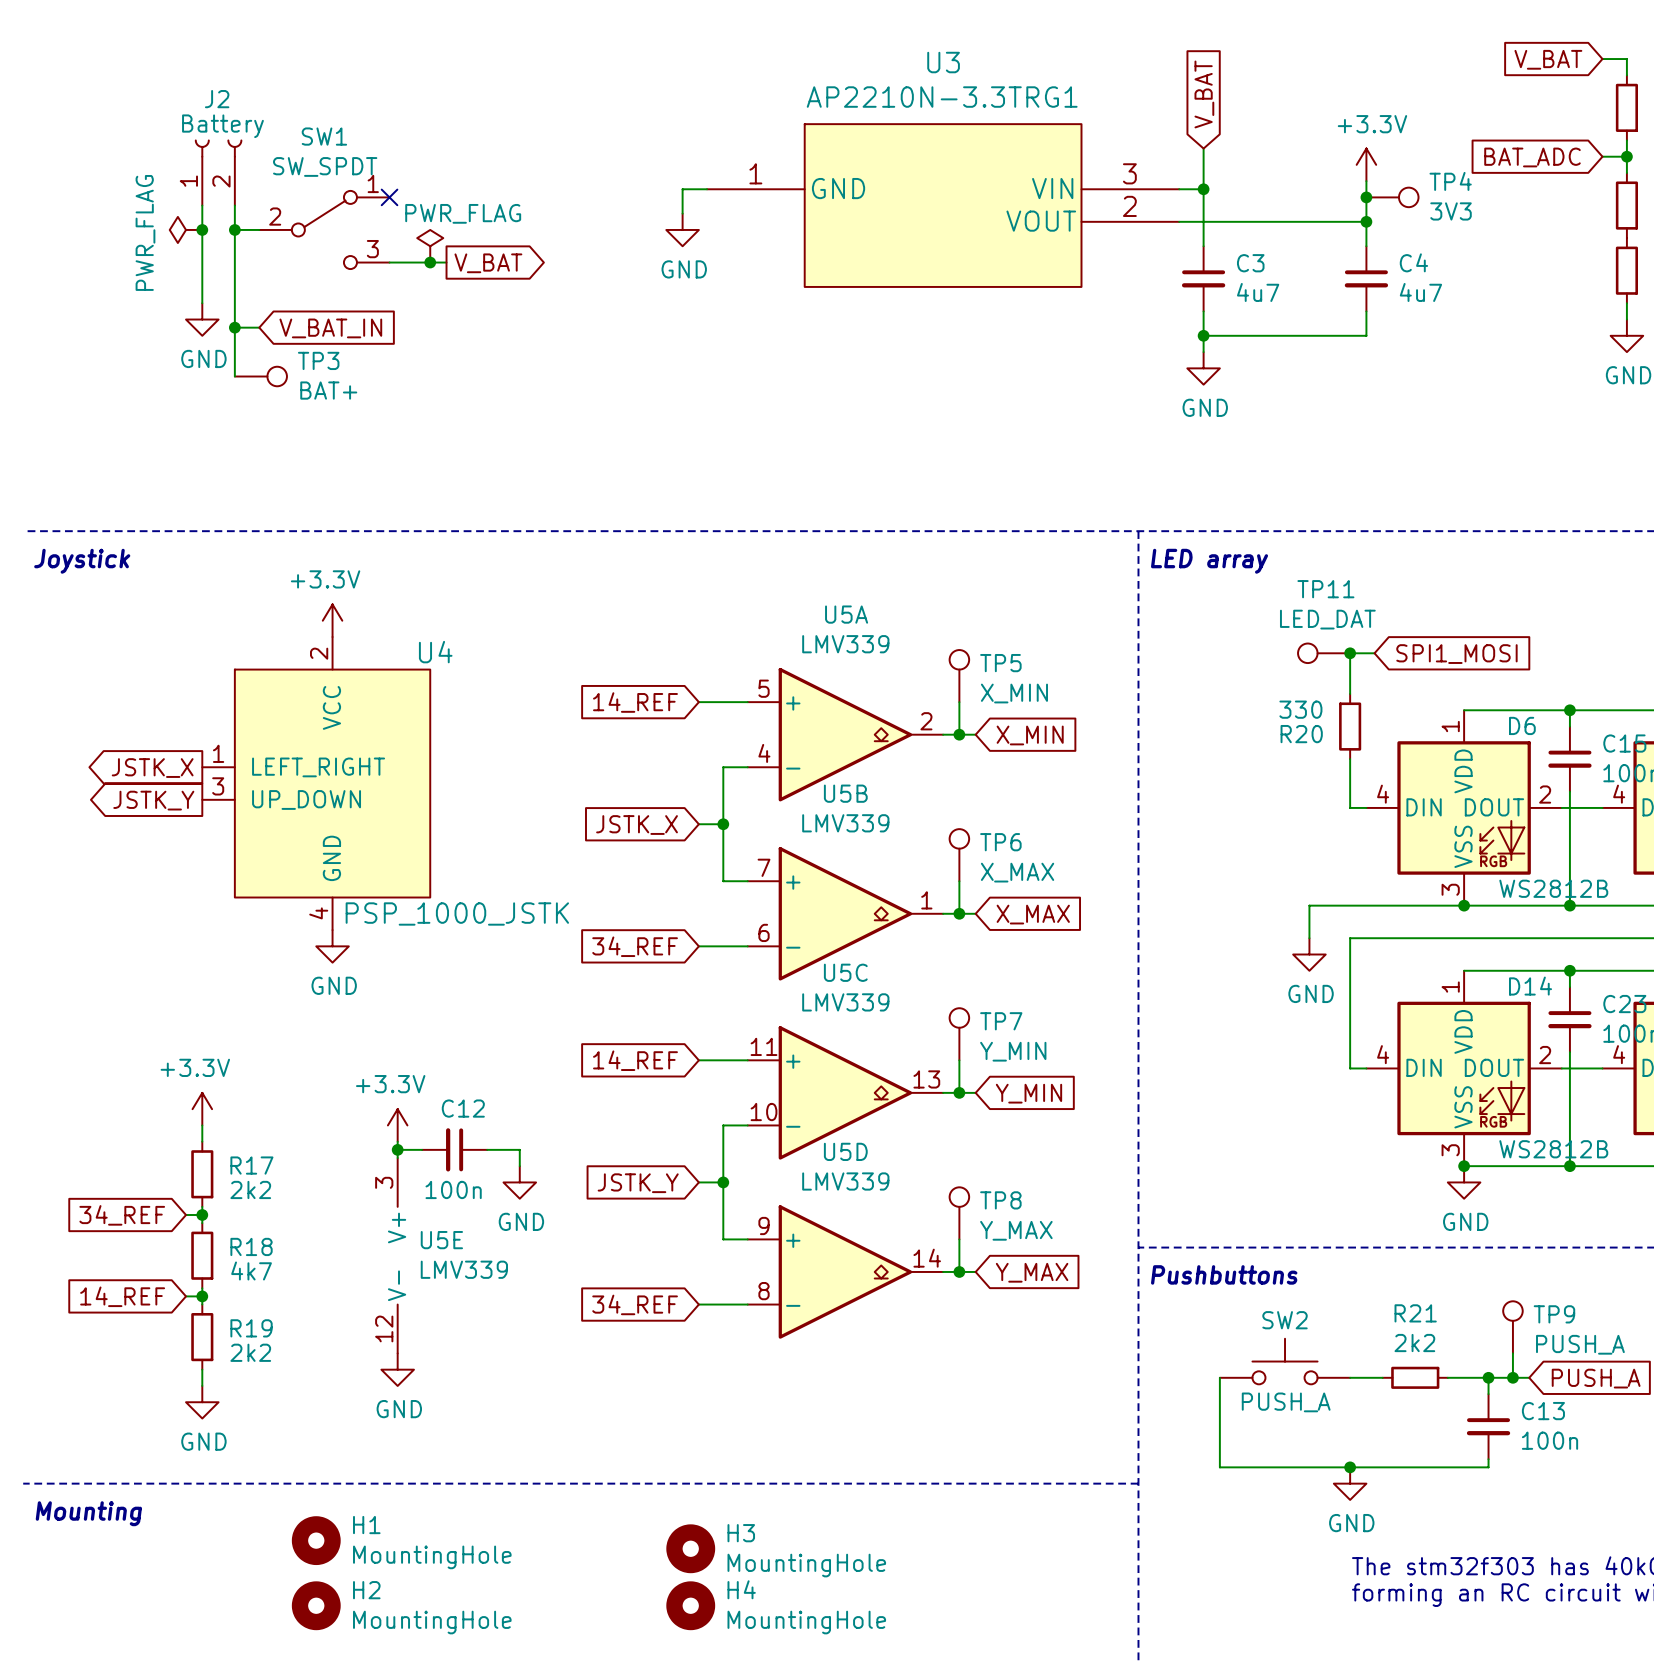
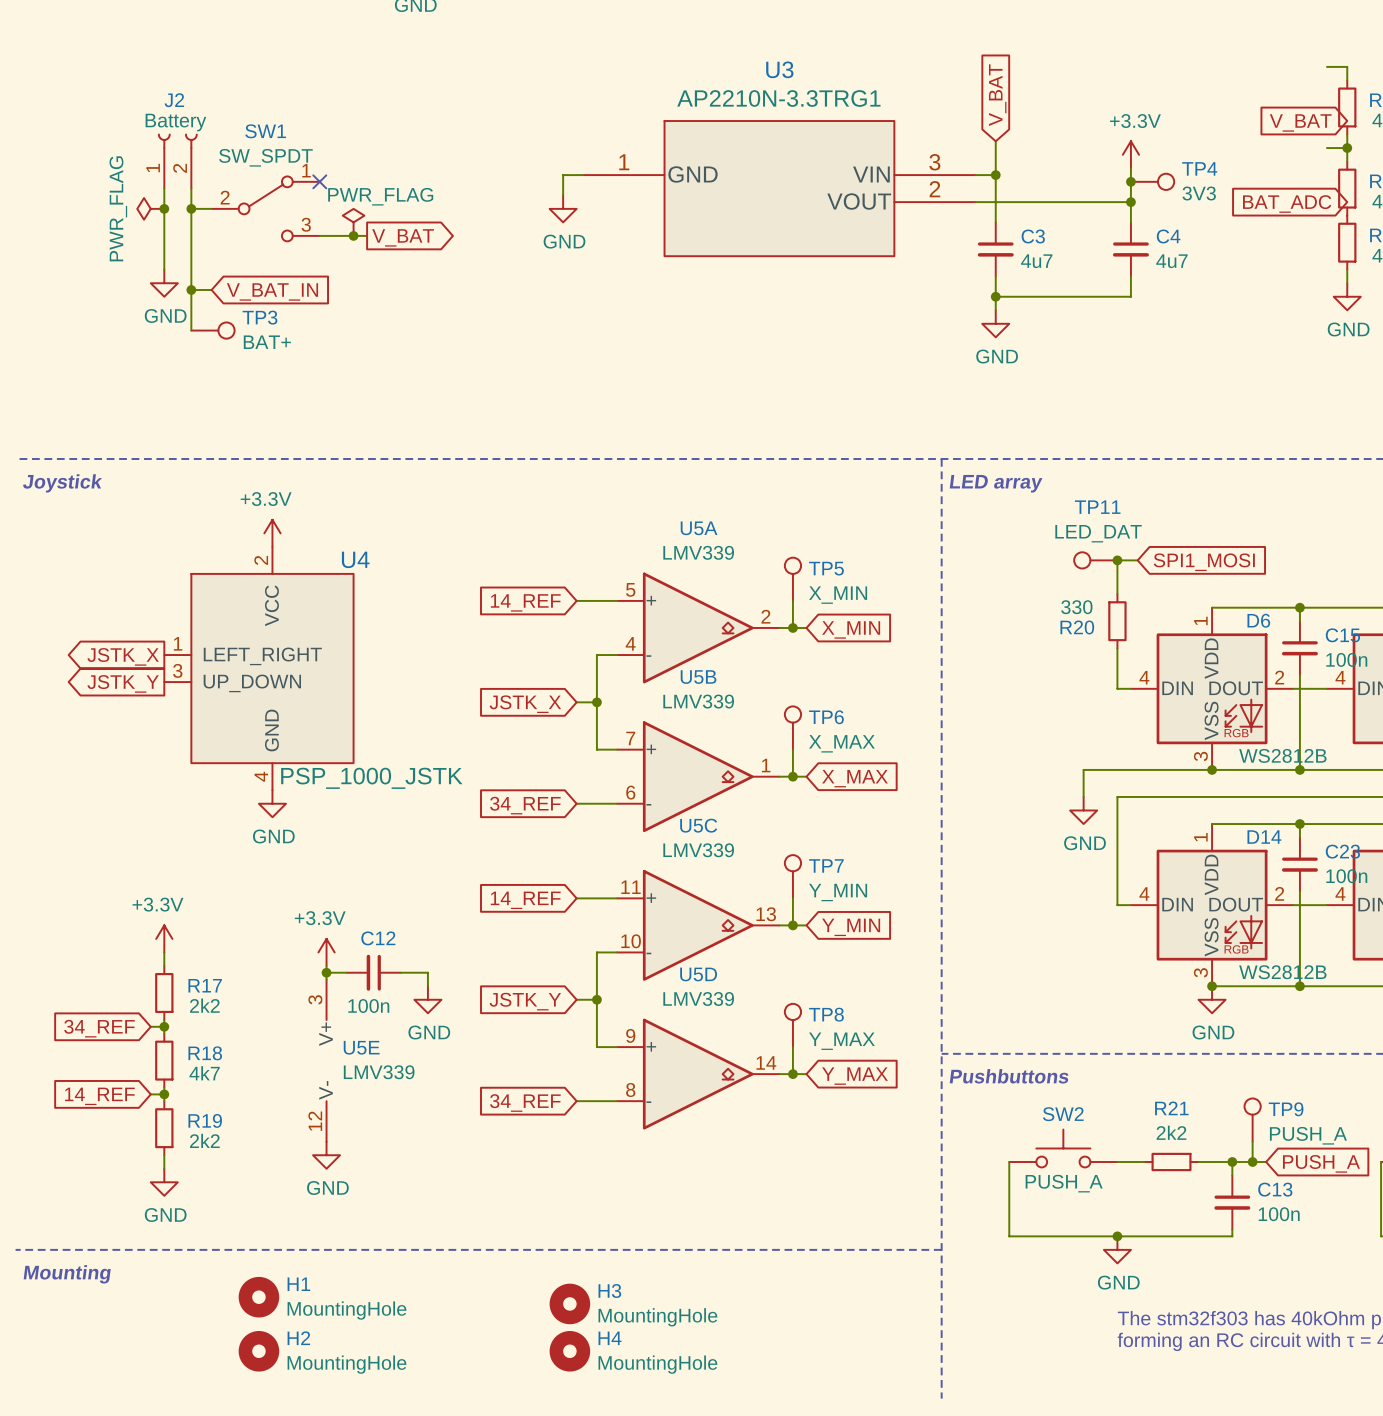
global label position: V_BAT (1548, 59) -> V_BAT (1300, 122)
global label position: BAT_ADC (1532, 157) -> BAT_ADC (1287, 203)

